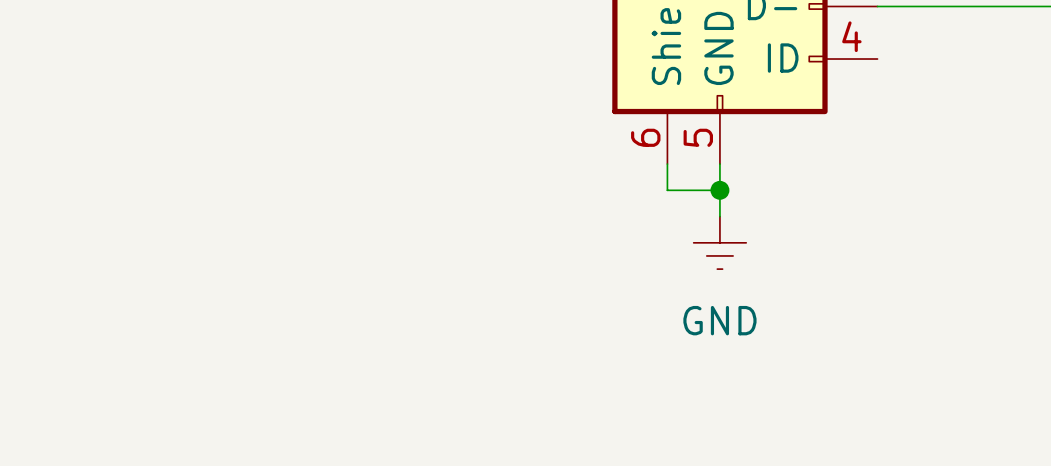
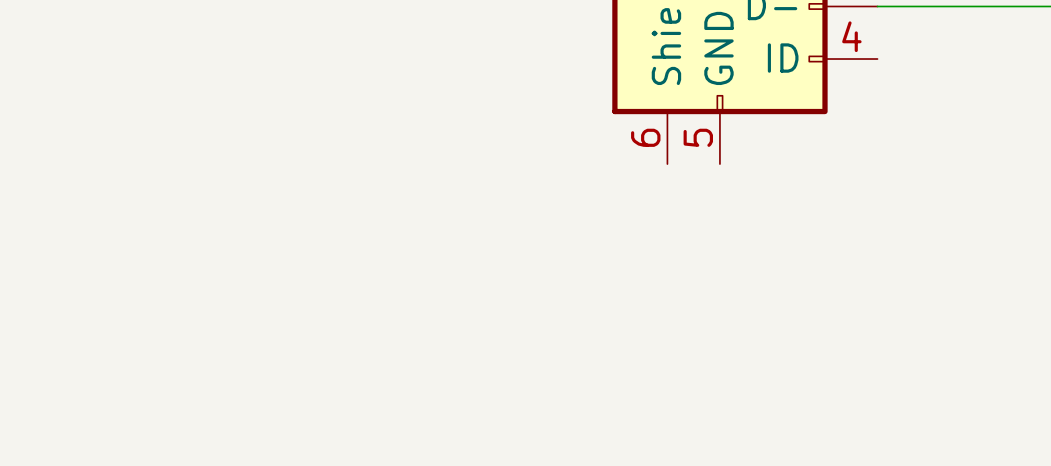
wire: (667, 164) (667, 190) (719, 190) -> none
wire: (719, 164) (719, 216) -> none
junction: (719, 190) -> none
power symbol: GND (719, 242) -> none

